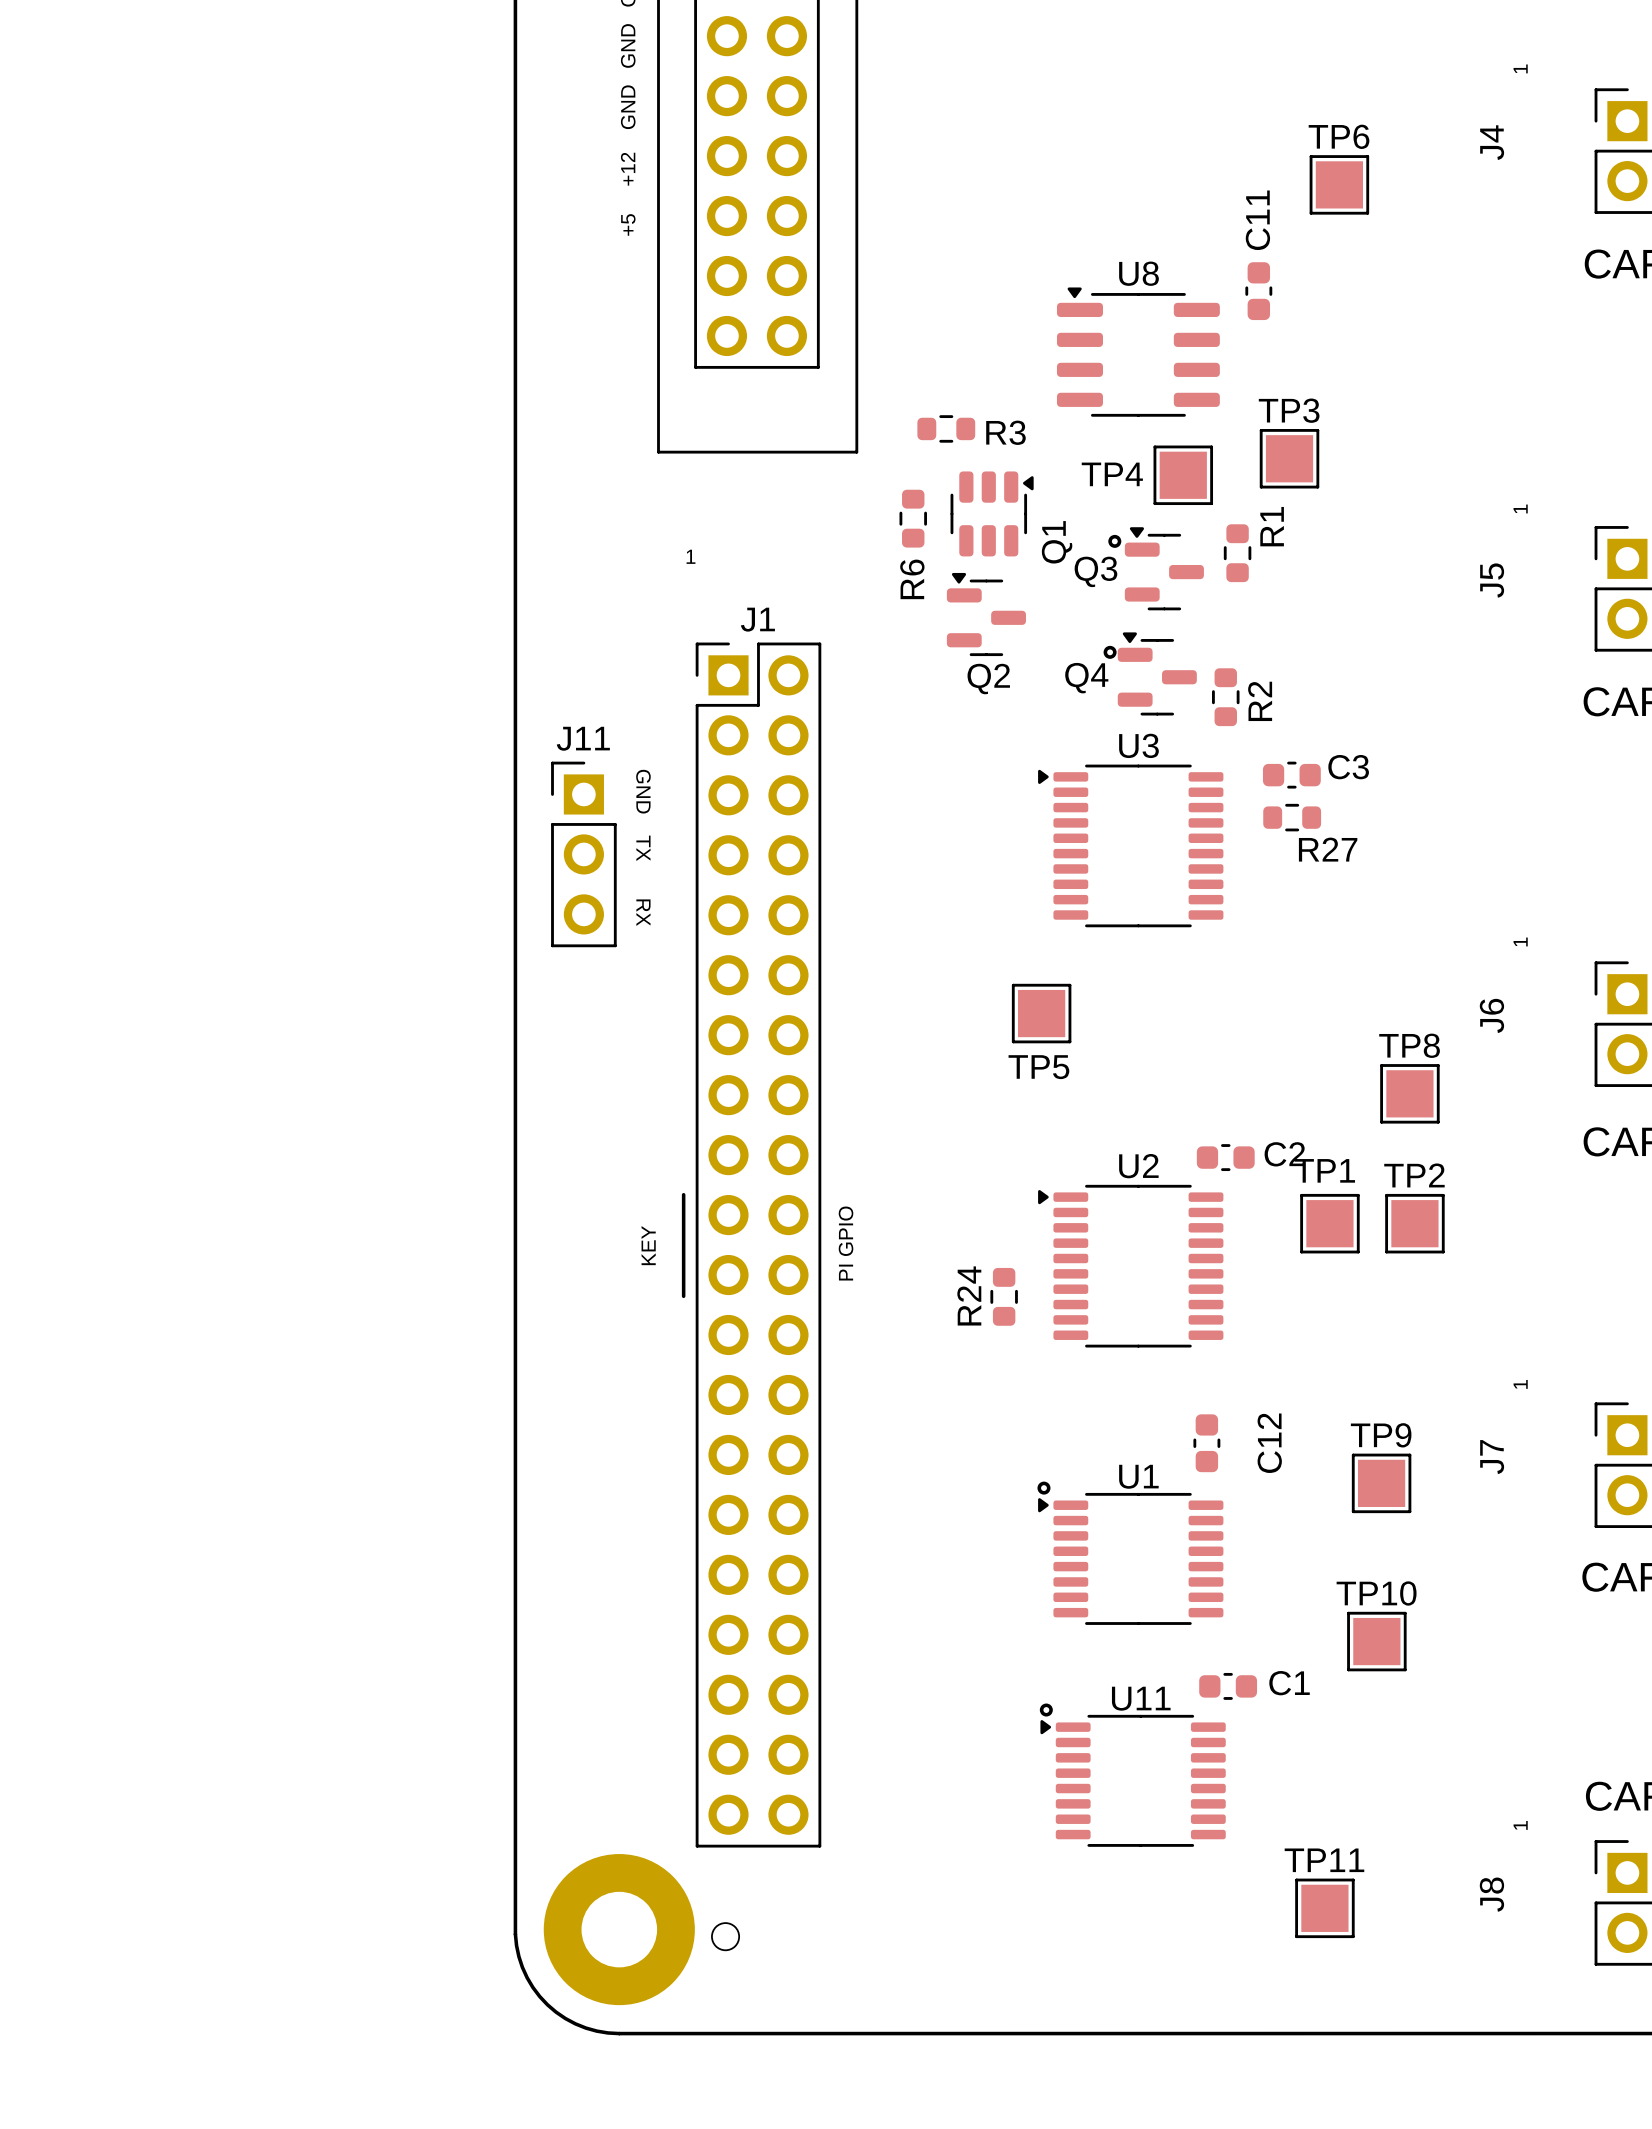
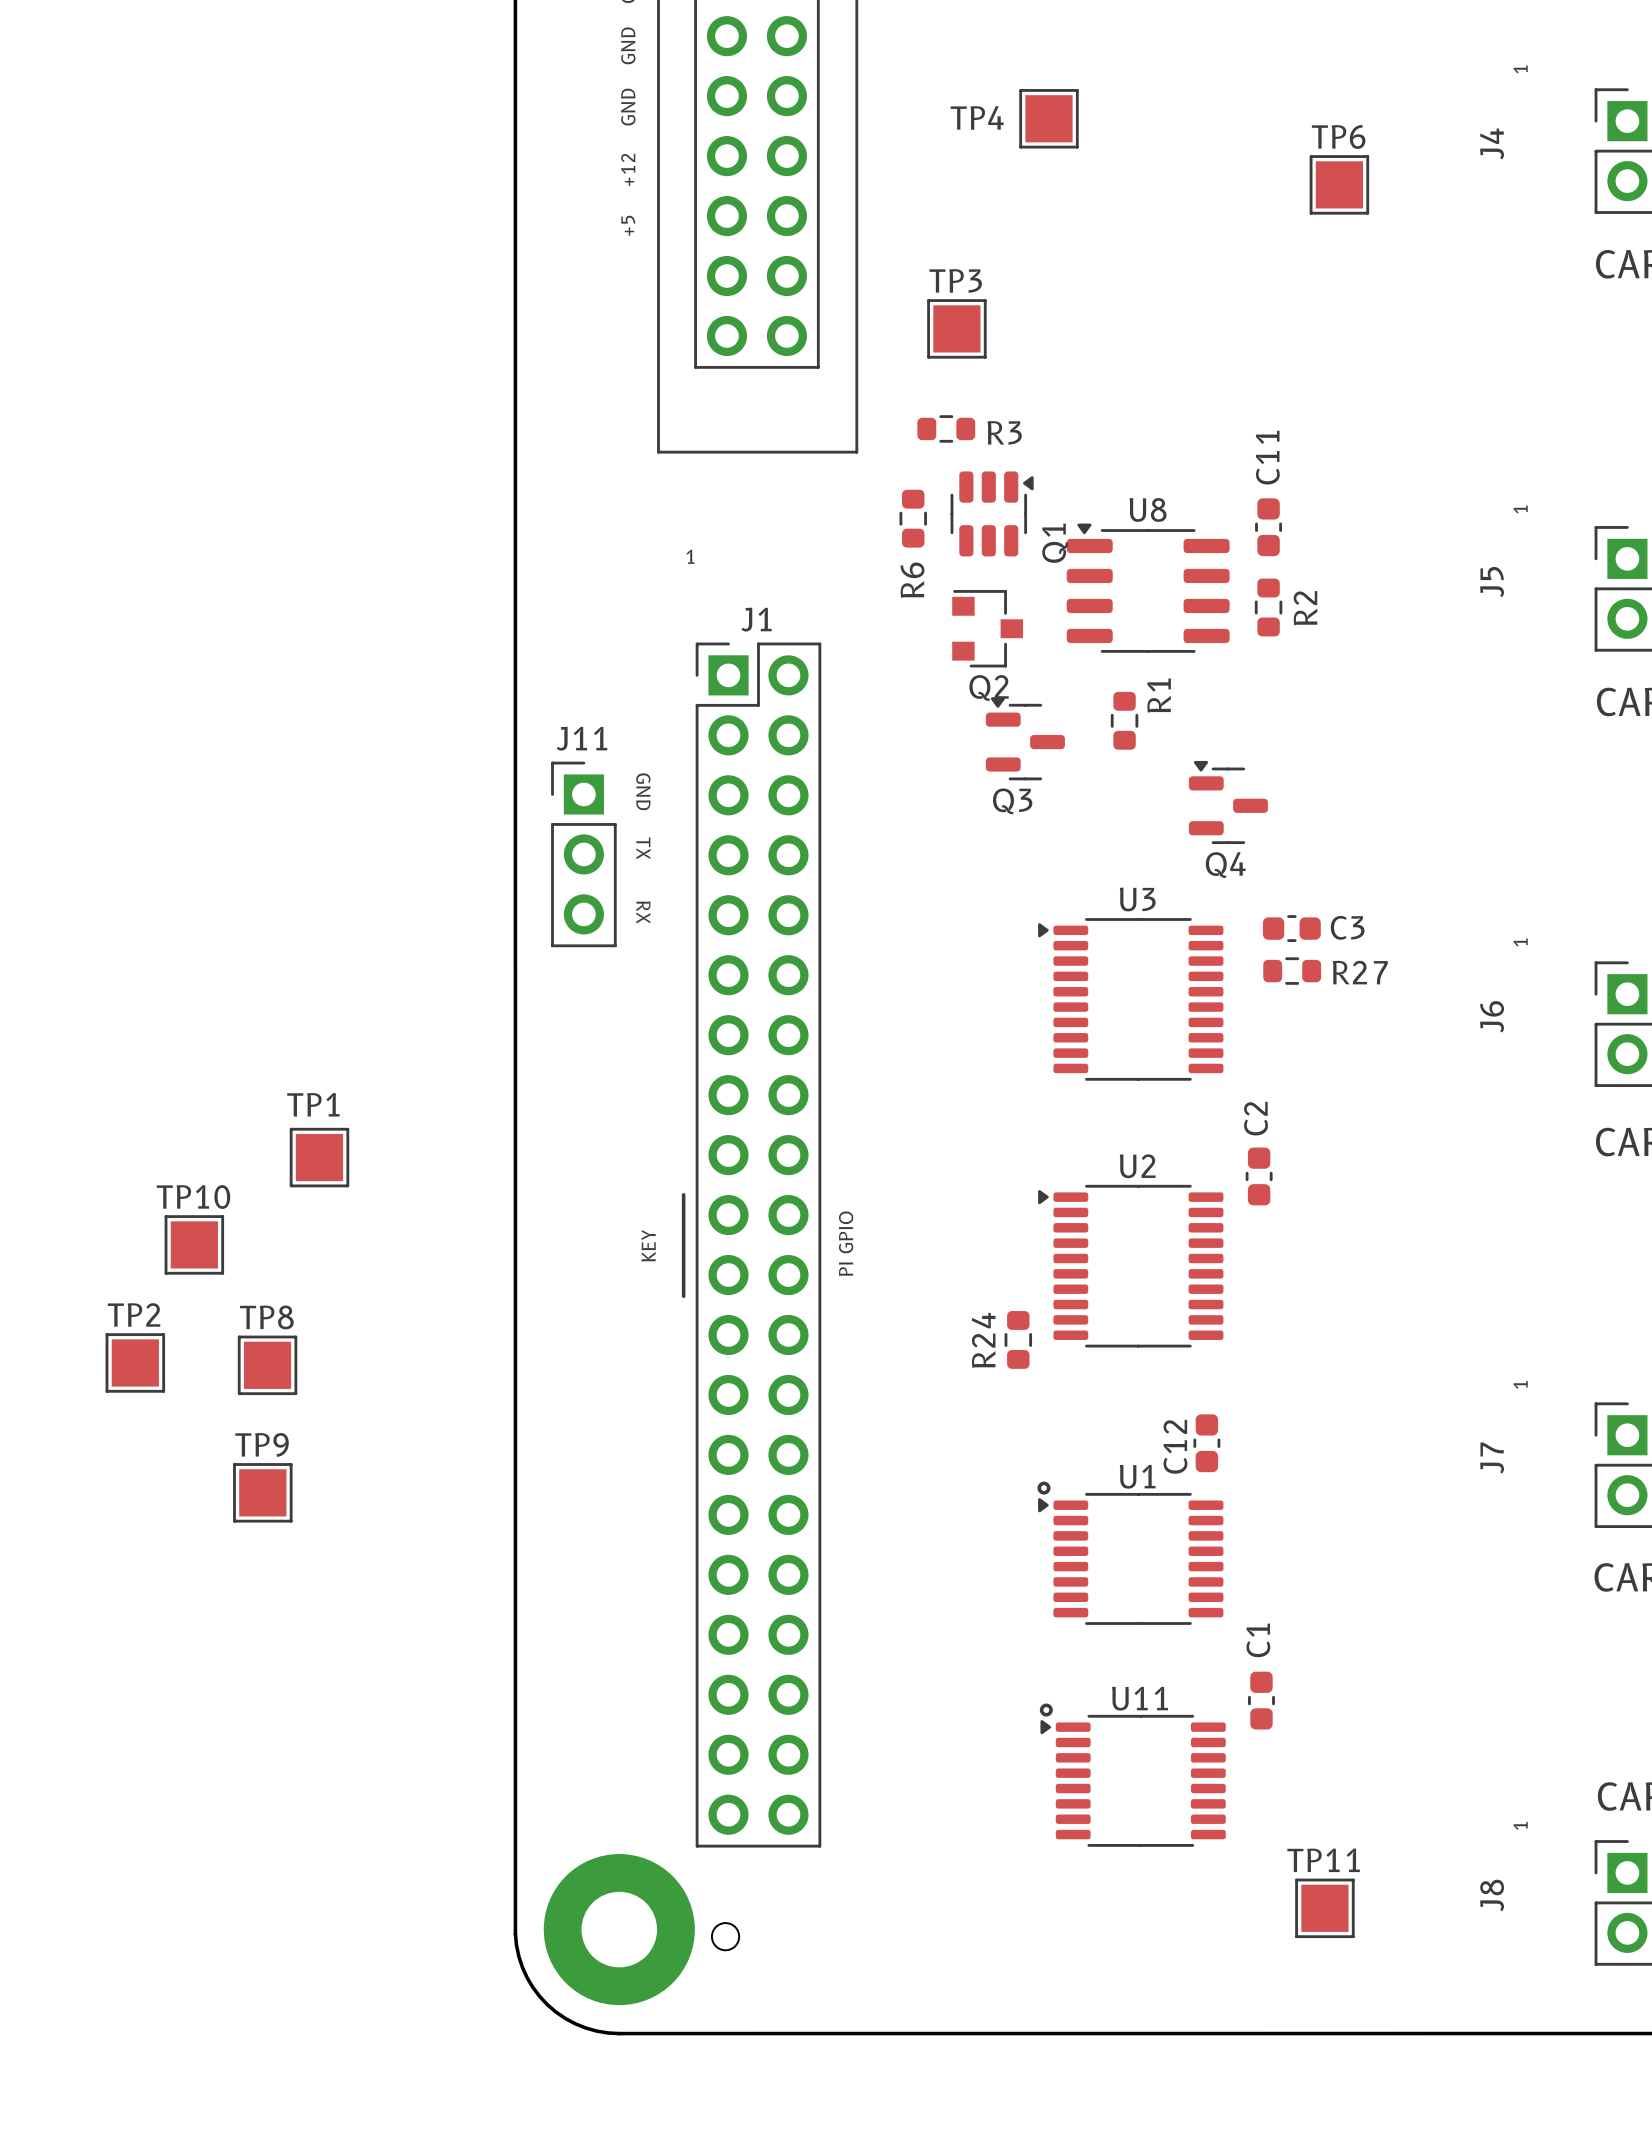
C11 position: (1258, 291) -> (1268, 527)
U8 position: (1138, 352) -> (1148, 588)
TP3 position: (1289, 458) -> (956, 328)
TP4 position: (1183, 475) -> (1048, 118)
drawing: [1108, 534, 1122, 548] -> none
R1 position: (1237, 553) -> (1124, 720)
Q3 position: (1164, 568) -> (1025, 738)
Q3 name position: Q3 (1095, 571) -> Q3 (1012, 801)
Q2 footprint: [946, 572, 1026, 657] -> [952, 590, 1024, 668]
drawing: [1103, 645, 1117, 659] -> none
Q4 position: (1157, 673) -> (1228, 802)
Q4 name position: Q4 (1086, 678) -> Q4 (1225, 865)
R2 position: (1225, 697) -> (1268, 607)
R2 name position: R2 (1260, 701) -> R2 (1305, 608)
C3 name position: C3 (1348, 767) -> C3 (1347, 927)
C3 position: (1291, 775) -> (1291, 928)
R27 position: (1292, 817) -> (1292, 971)
U3 position: (1130, 845) -> (1130, 999)
R27 name position: R27 (1328, 849) -> R27 (1360, 972)
TP5: (1041, 1013) -> none
TP8 position: (1409, 1093) -> (267, 1365)
C2 name position: C2 (1284, 1154) -> C2 (1256, 1118)
C2 rotation: 0° (1225, 1157) -> 90° clockwise (1259, 1176)
C2 position: (1225, 1157) -> (1259, 1176)
TP1 position: (1329, 1223) -> (319, 1157)
TP2 position: (1414, 1223) -> (135, 1362)
R24 position: (1004, 1296) -> (1018, 1339)
C12 name position: C12 (1269, 1443) -> C12 (1175, 1446)
TP9 position: (1381, 1483) -> (262, 1492)
TP10 position: (1376, 1641) -> (194, 1244)
C1 name position: C1 (1289, 1683) -> C1 (1258, 1640)
C1 rotation: 0° (1228, 1686) -> 90° clockwise (1261, 1700)
C1 position: (1228, 1686) -> (1261, 1700)

